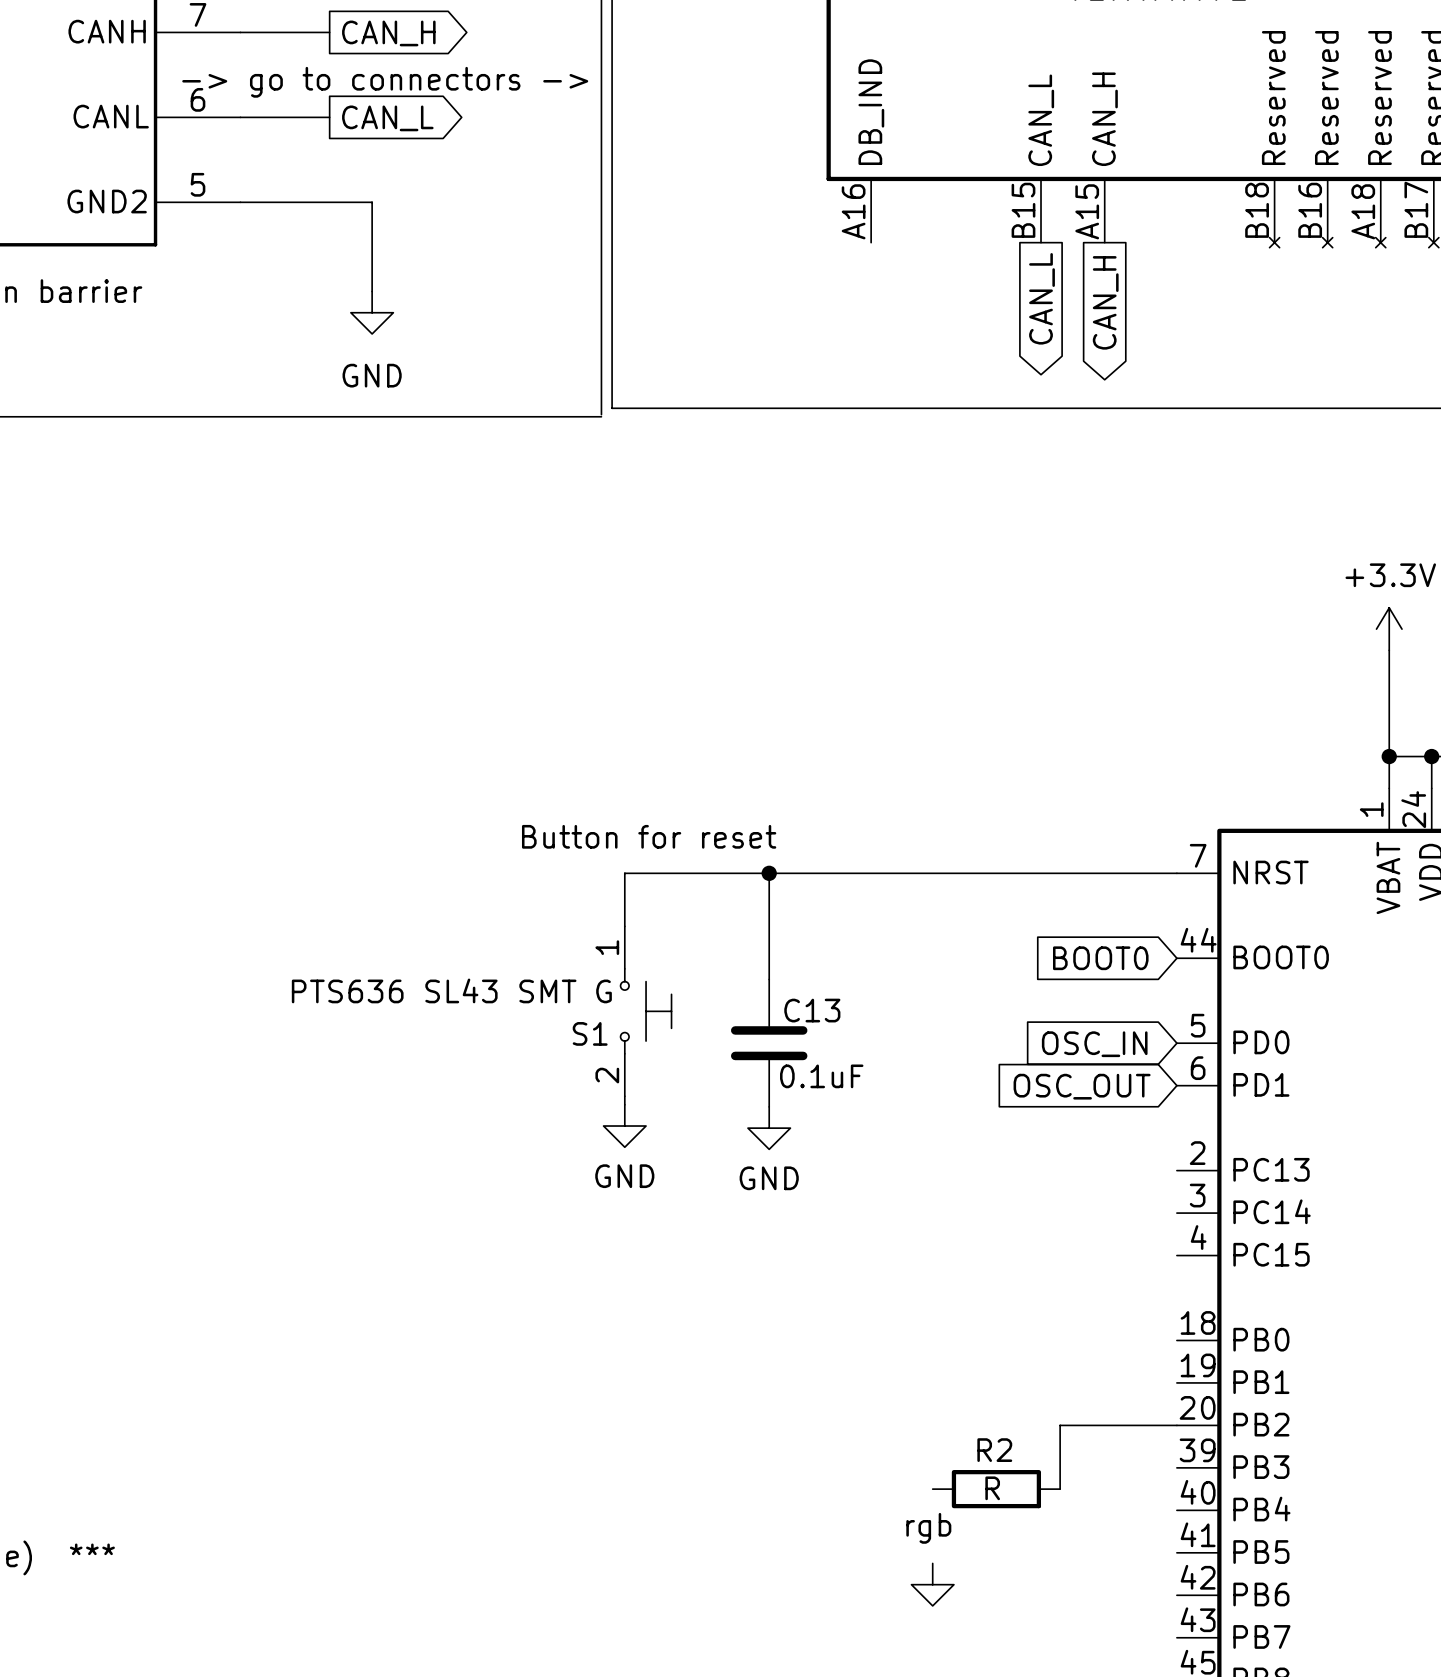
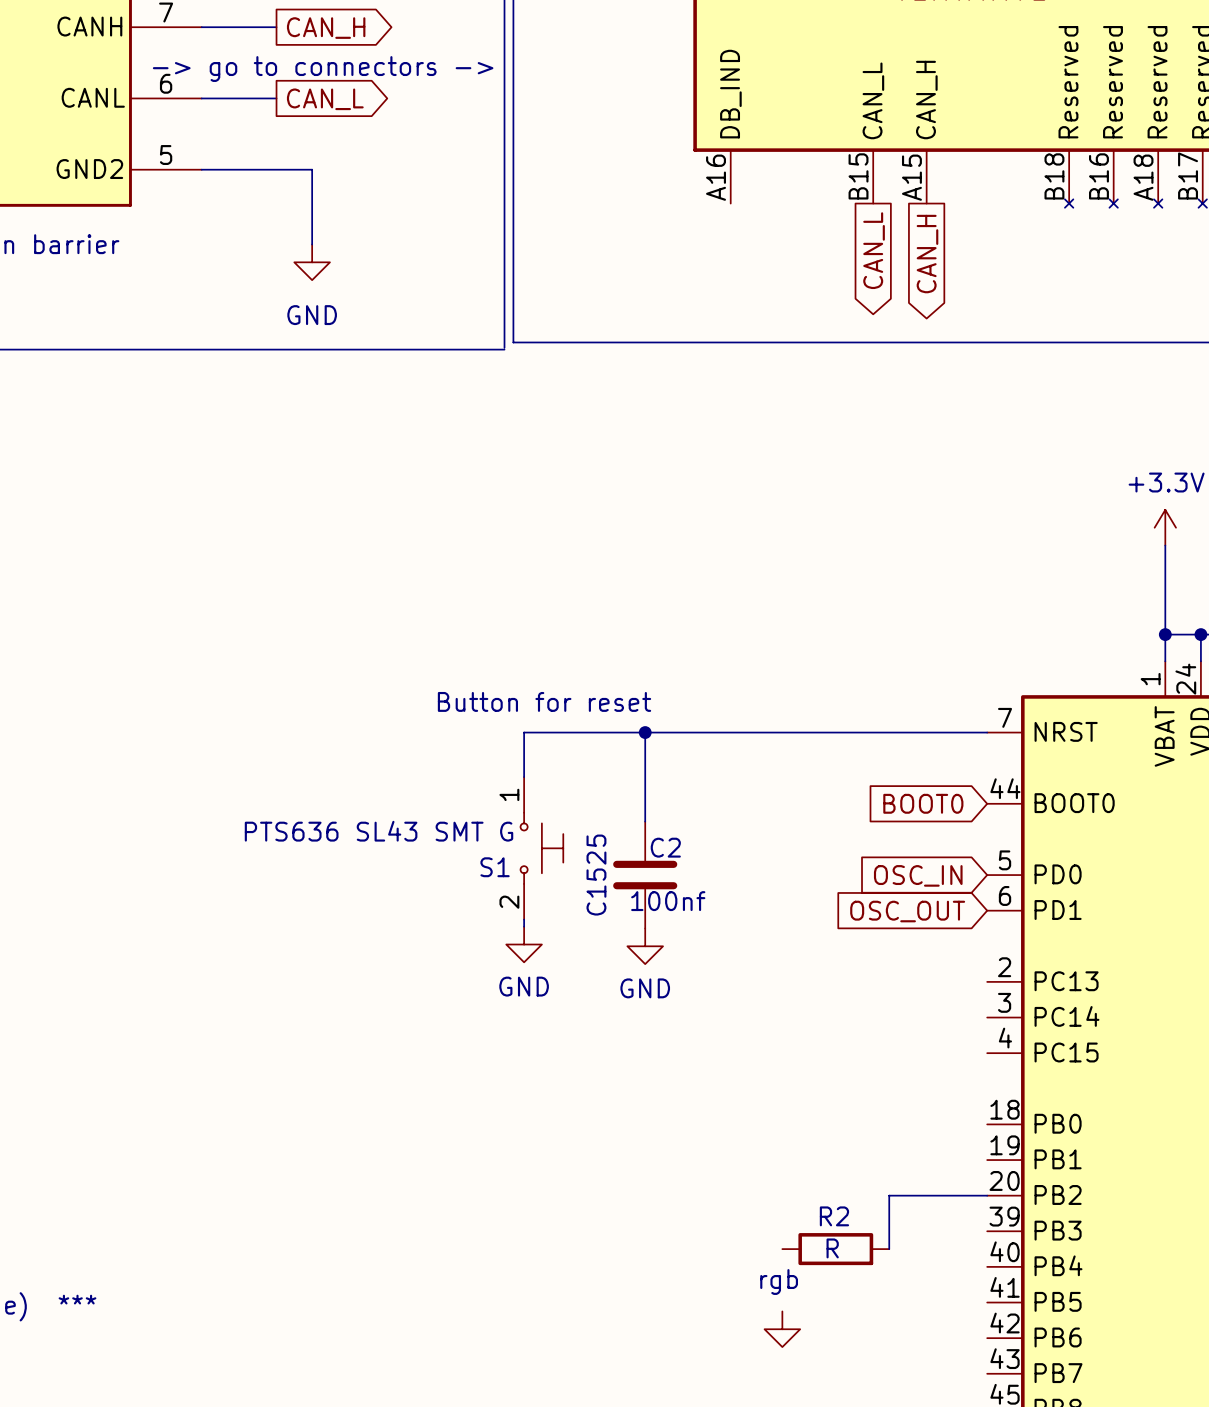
C13 name: C13 (812, 1010) -> C2 (665, 847)
C13 text: none -> C1525 (596, 875)
C13 value: 0.1uF (821, 1076) -> 100nf (668, 901)

